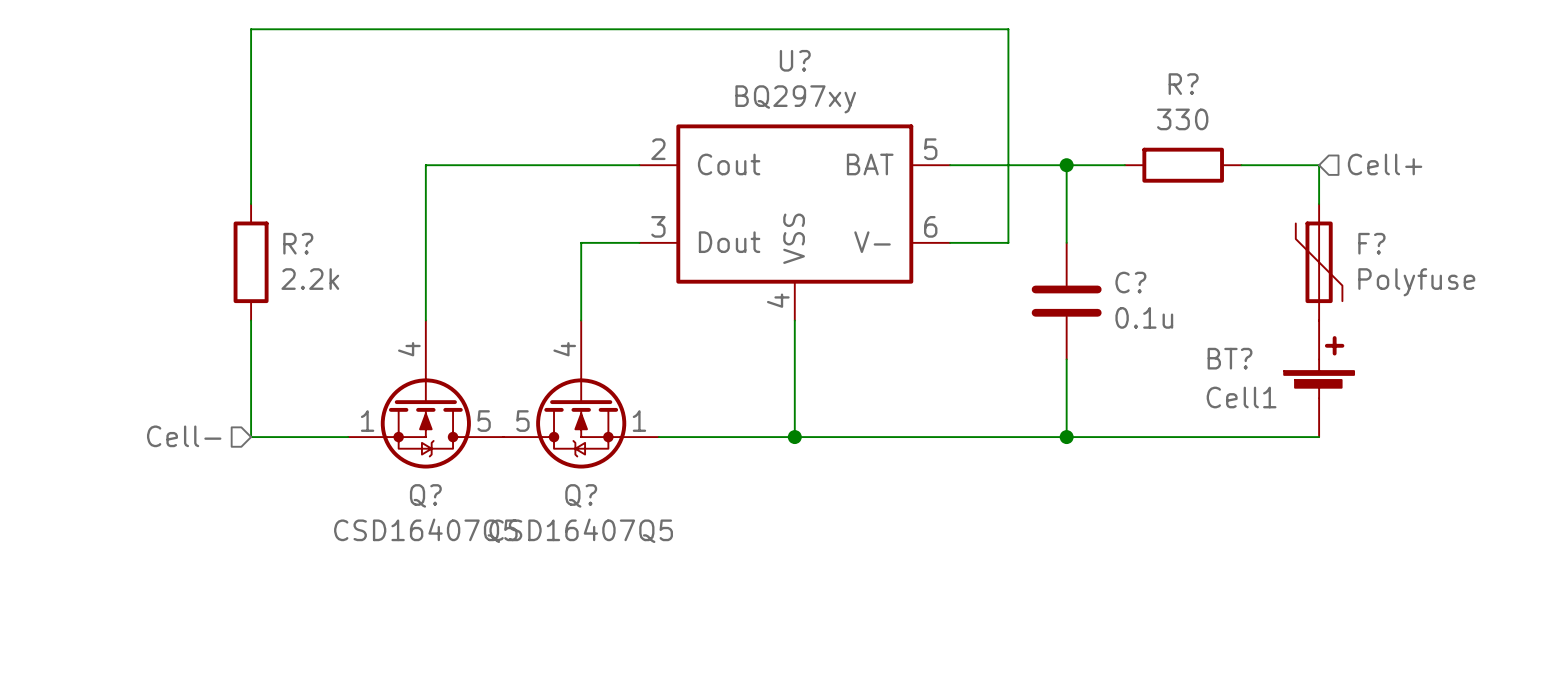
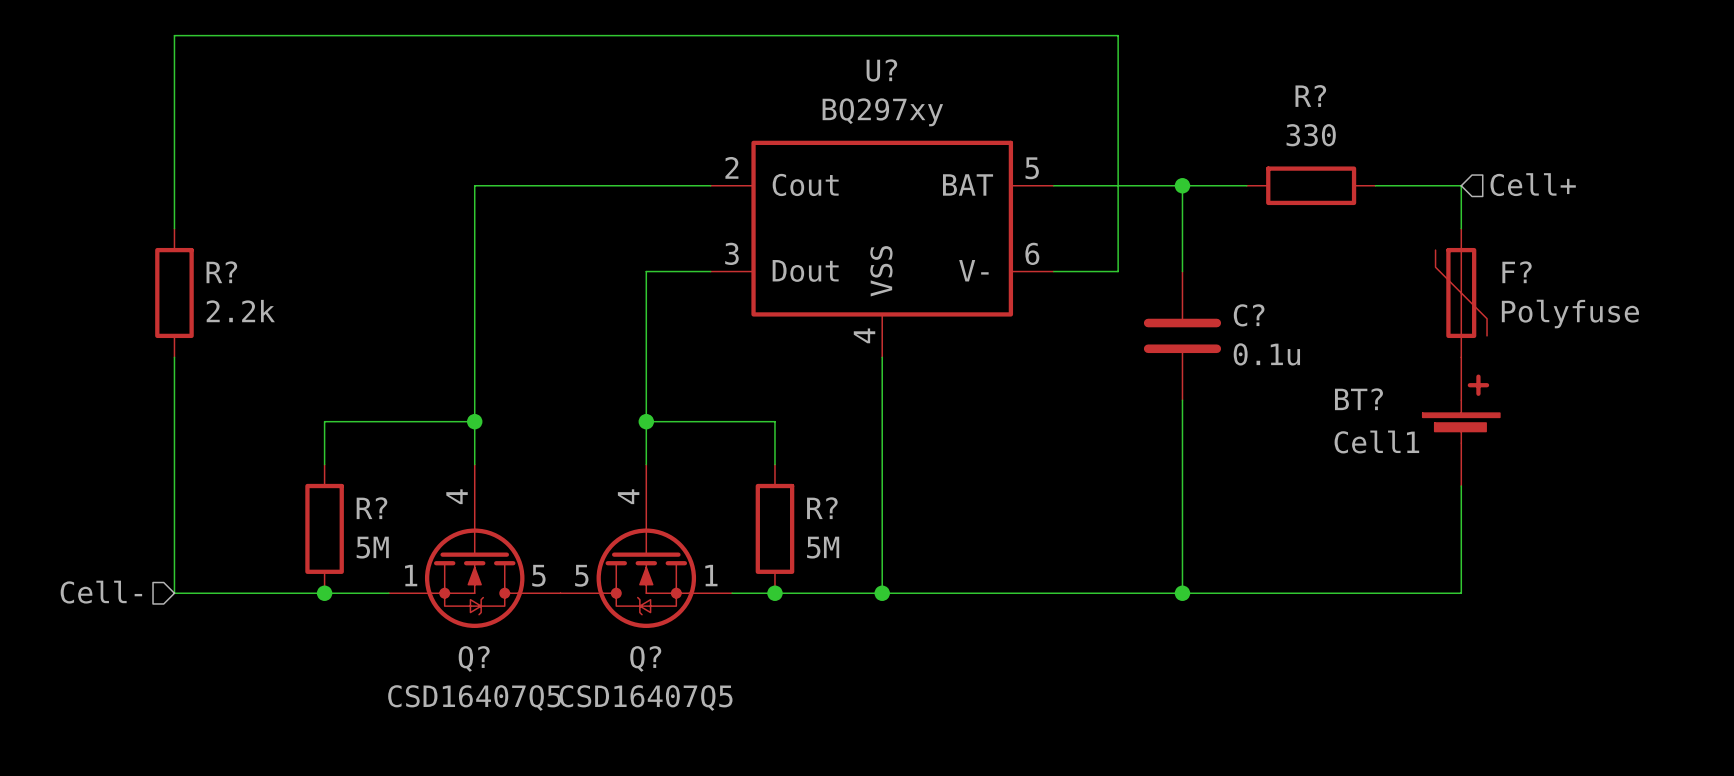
wire: (251, 29) (251, 204) -> (281, 35) (174, 35) (174, 228)
R? position: (251, 262) -> (174, 292)
wire: none -> (174, 357) (174, 593) (388, 593)
wire: (251, 320) (251, 437) (348, 437) -> none
wire: none -> (474, 421) (324, 421) (324, 464)
junction: none -> (474, 421)
wire: none -> (646, 421) (774, 421) (774, 464)
junction: none -> (646, 421)
Q? position: (425, 394) -> (474, 546)
Q? position: (581, 394) -> (646, 546)
hierarchical label position: Cell- (184, 436) -> Cell- (101, 592)
wire: (658, 437) (1319, 437) -> (732, 593) (1461, 593) (1461, 486)
wire: none -> (882, 486) (882, 593)
junction: (794, 437) -> none
wire: none -> (1182, 486) (1182, 593)
junction: (1066, 437) -> none
R?: none -> 5M (324, 528)
R?: none -> 5M (774, 528)
junction: none -> (324, 593)
junction: none -> (774, 593)
junction: none -> (882, 593)
junction: none -> (1182, 593)

